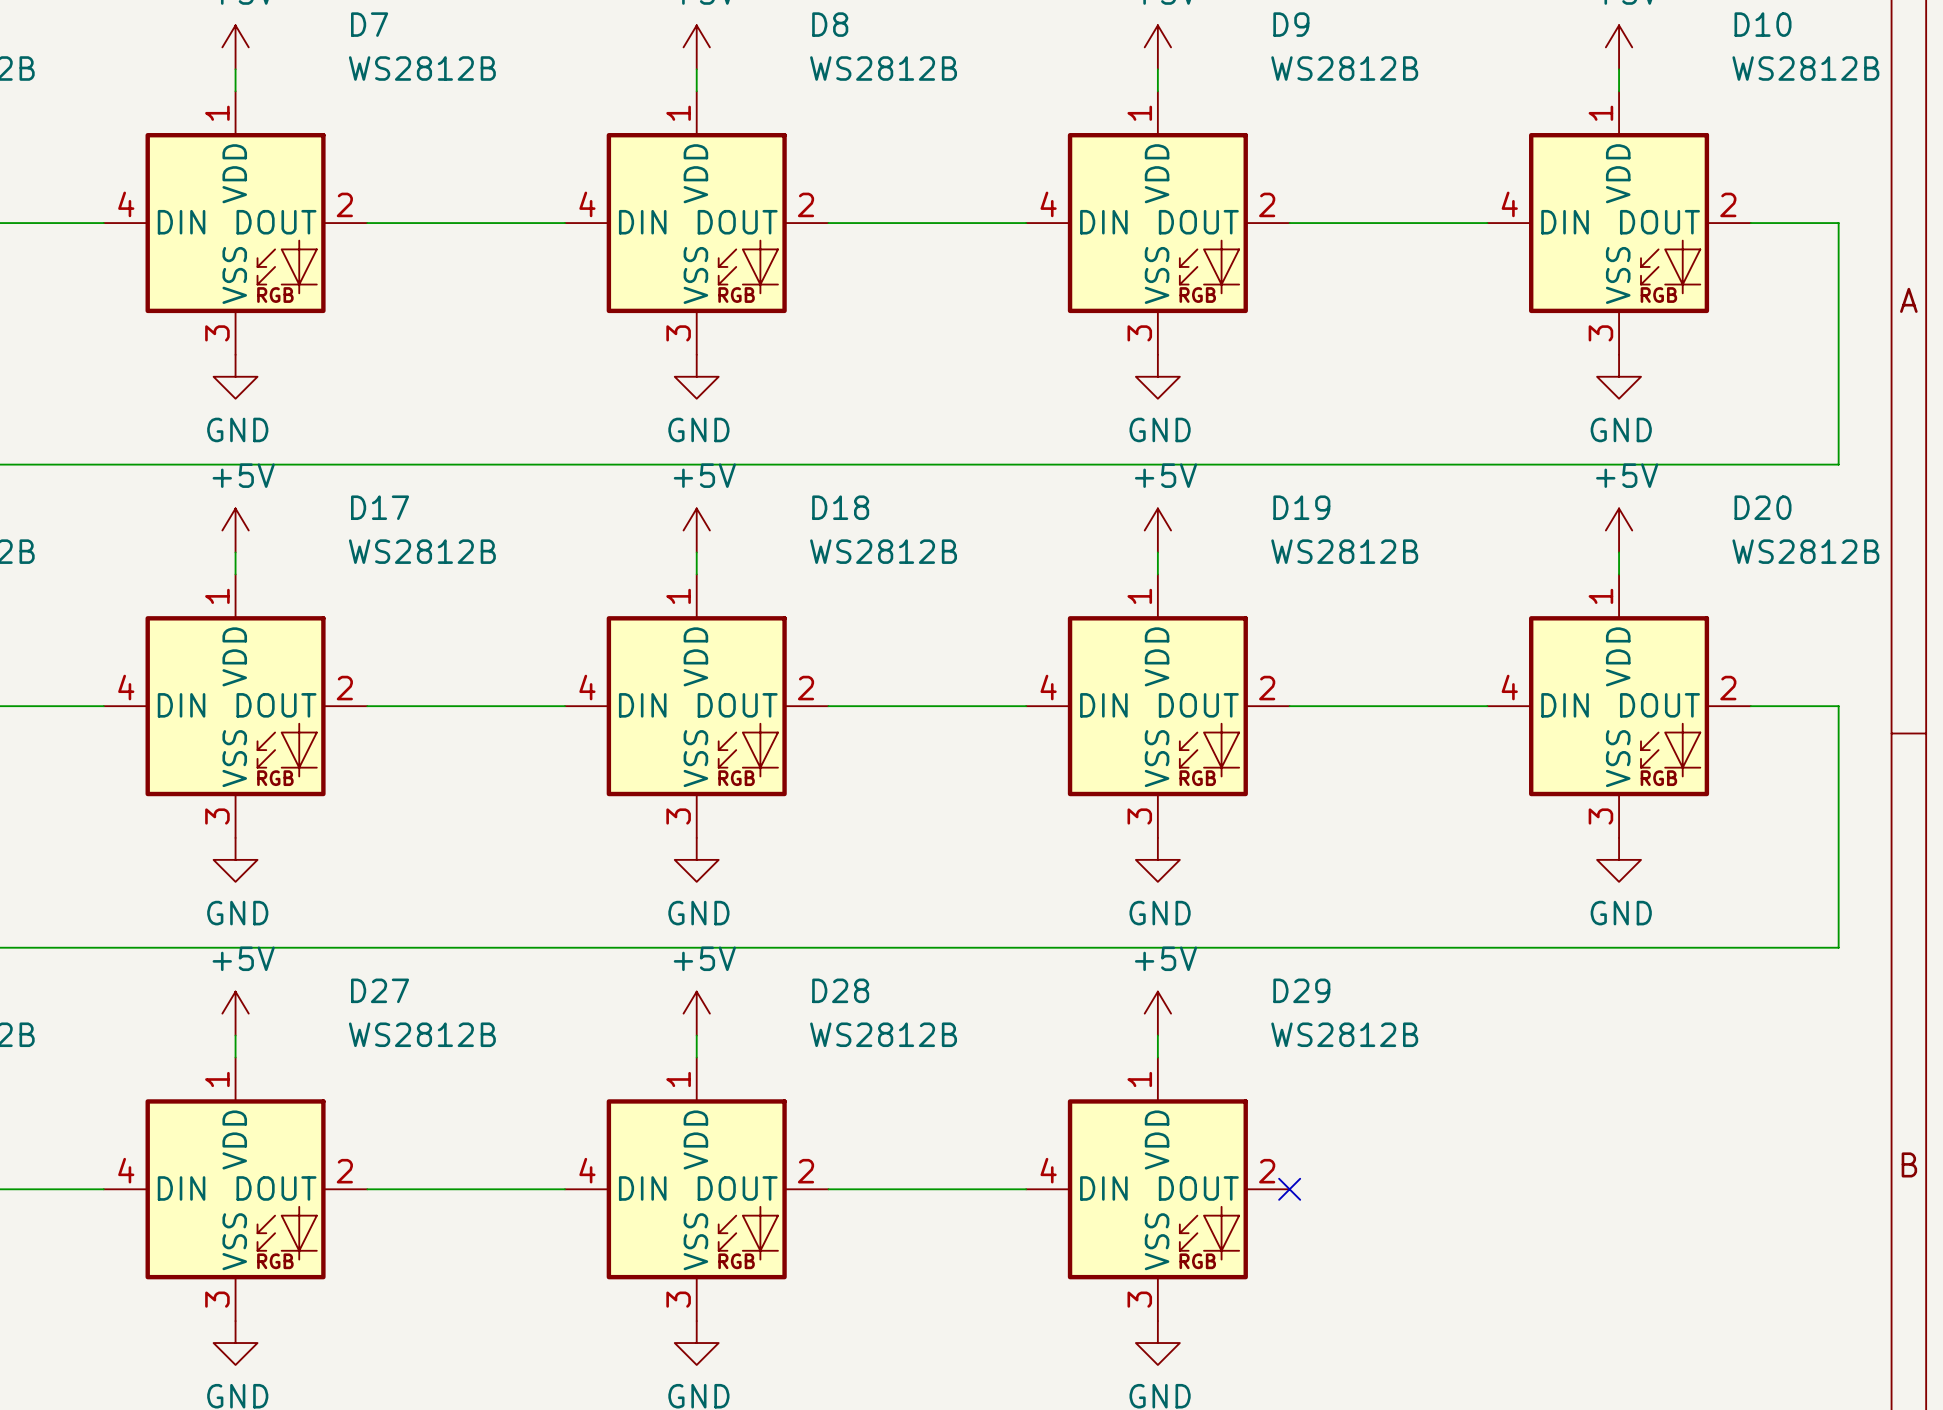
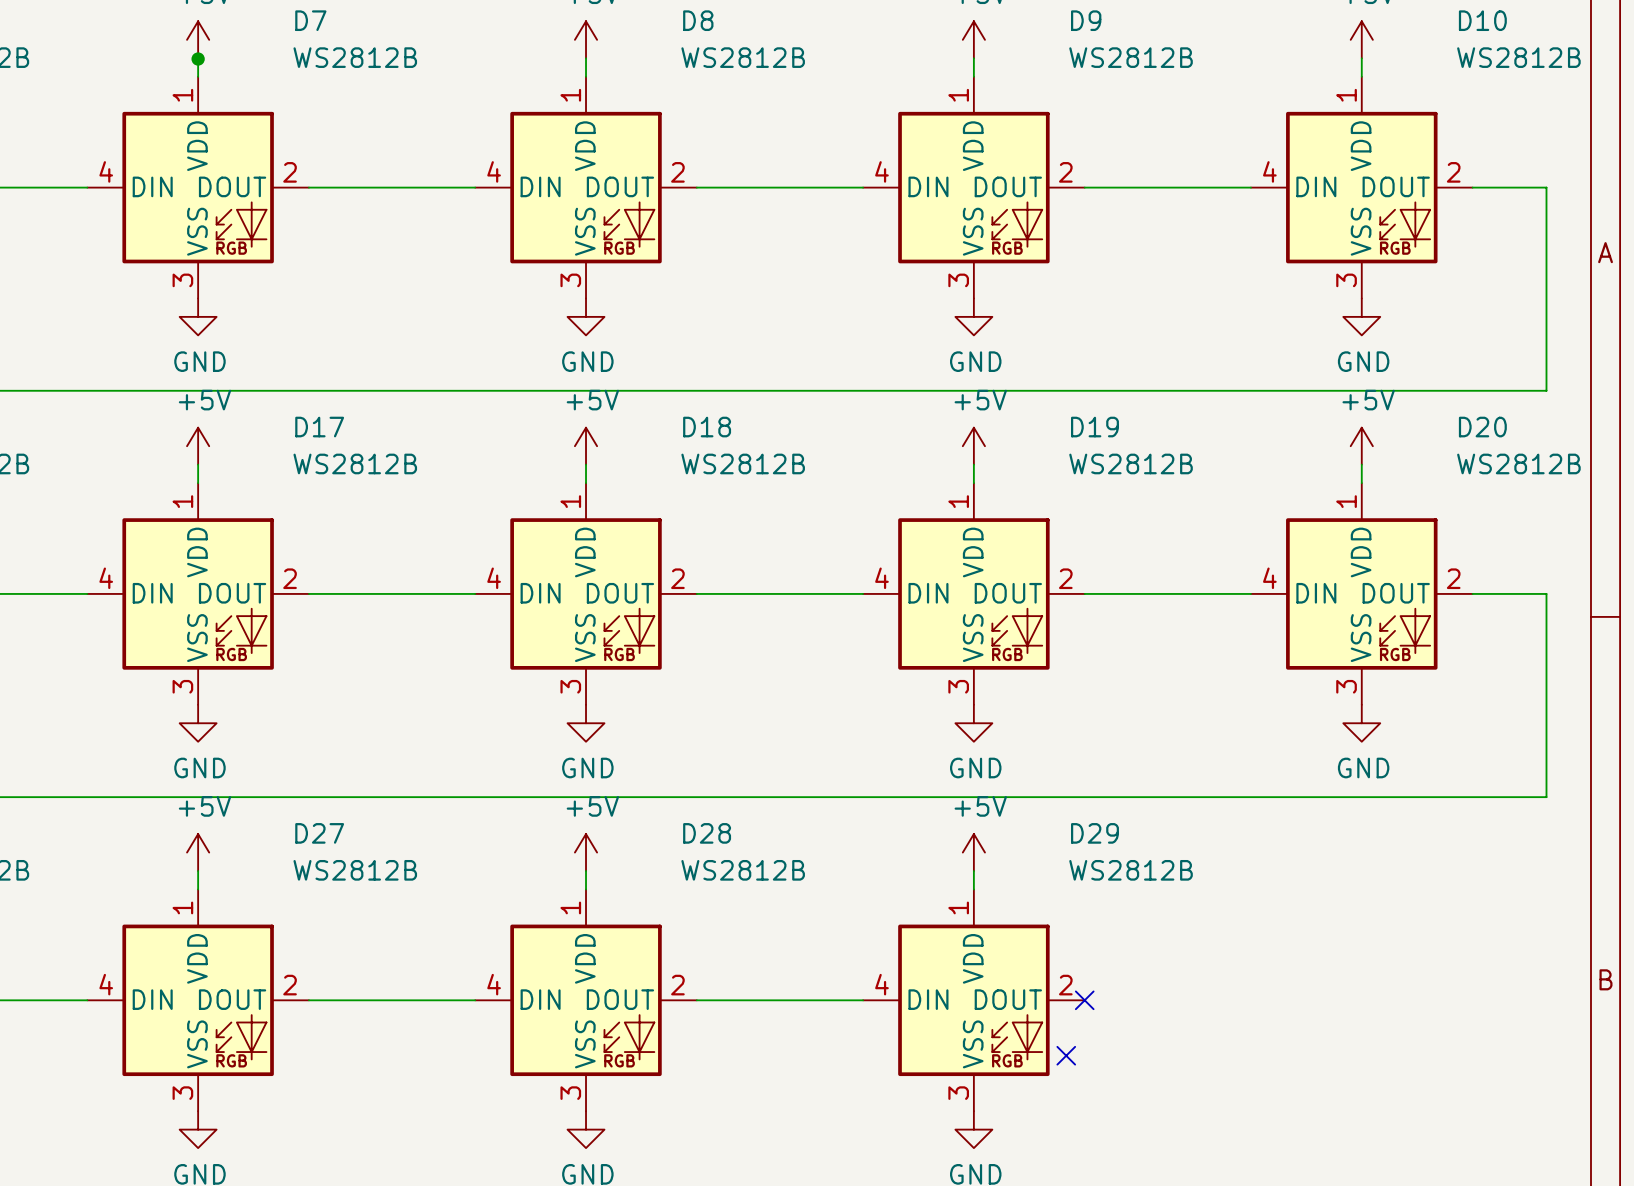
junction: none -> (198, 59)
no-connect mark: none -> (1066, 1055)

